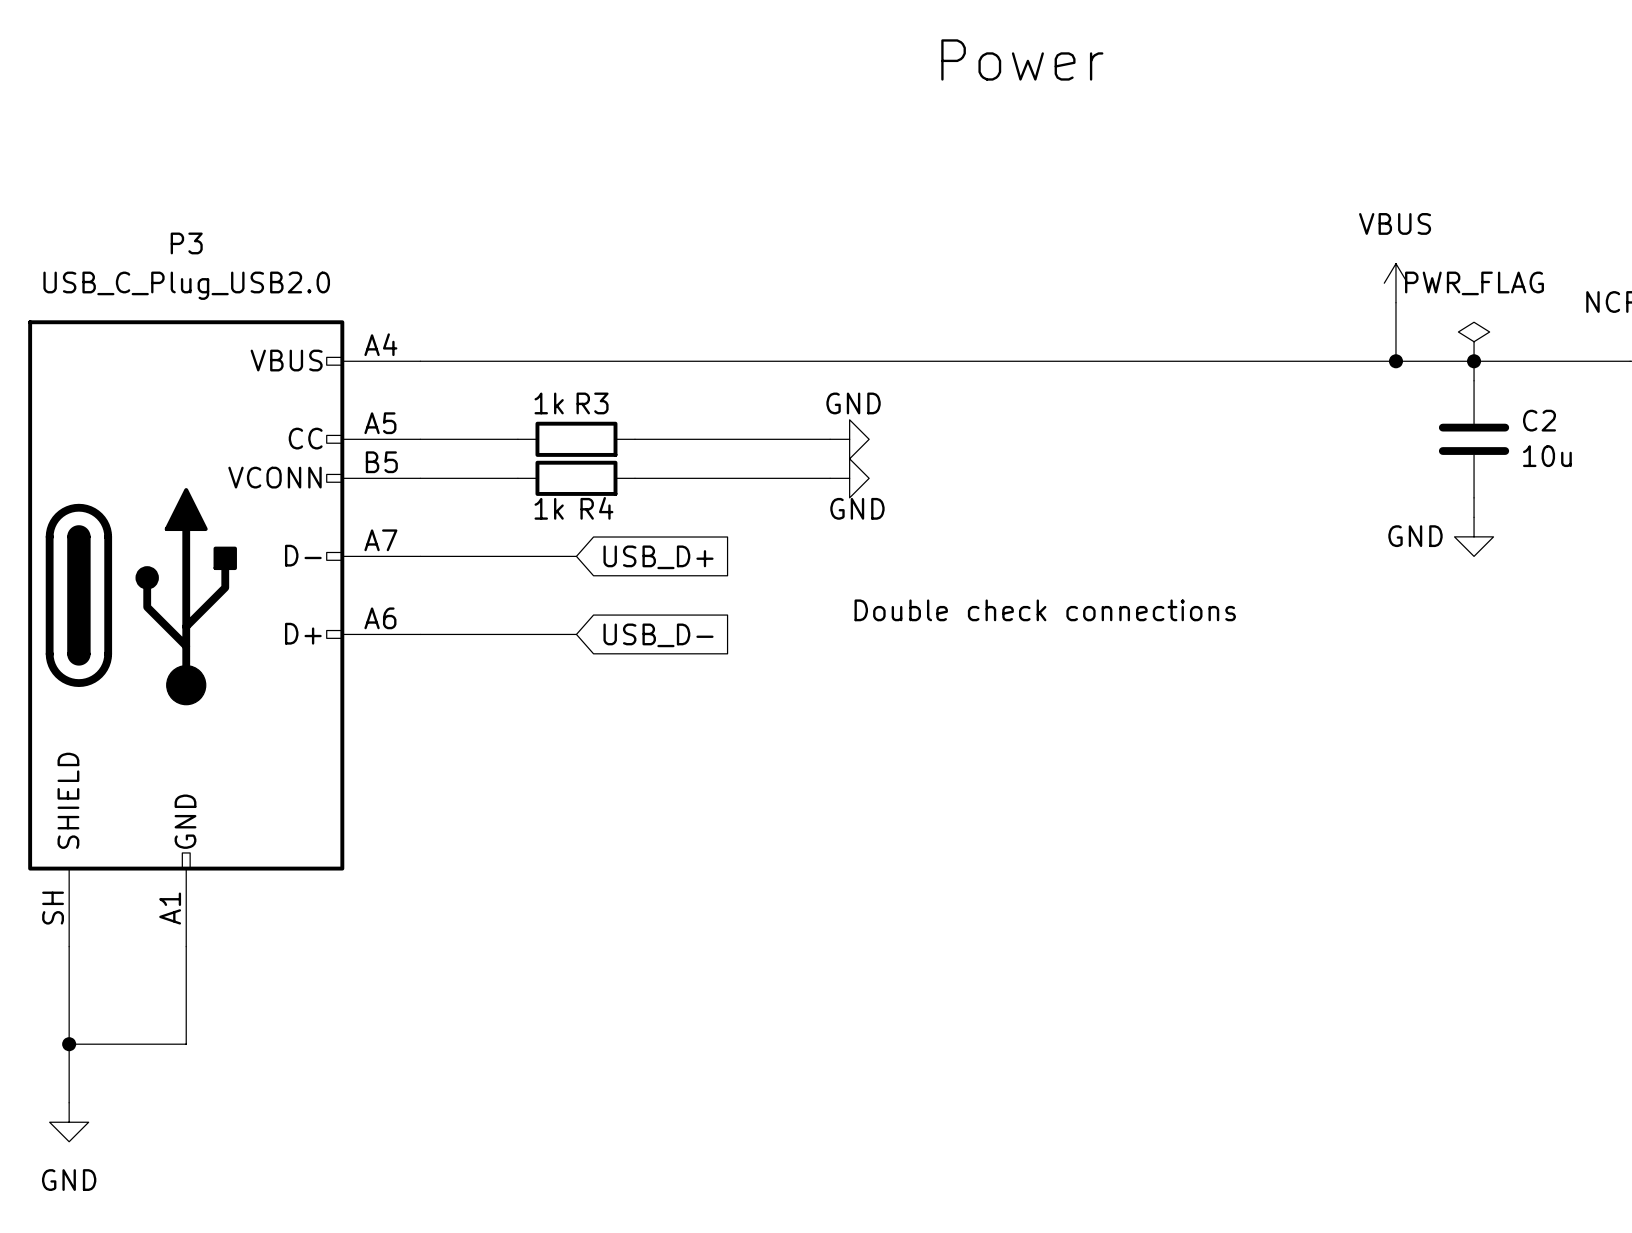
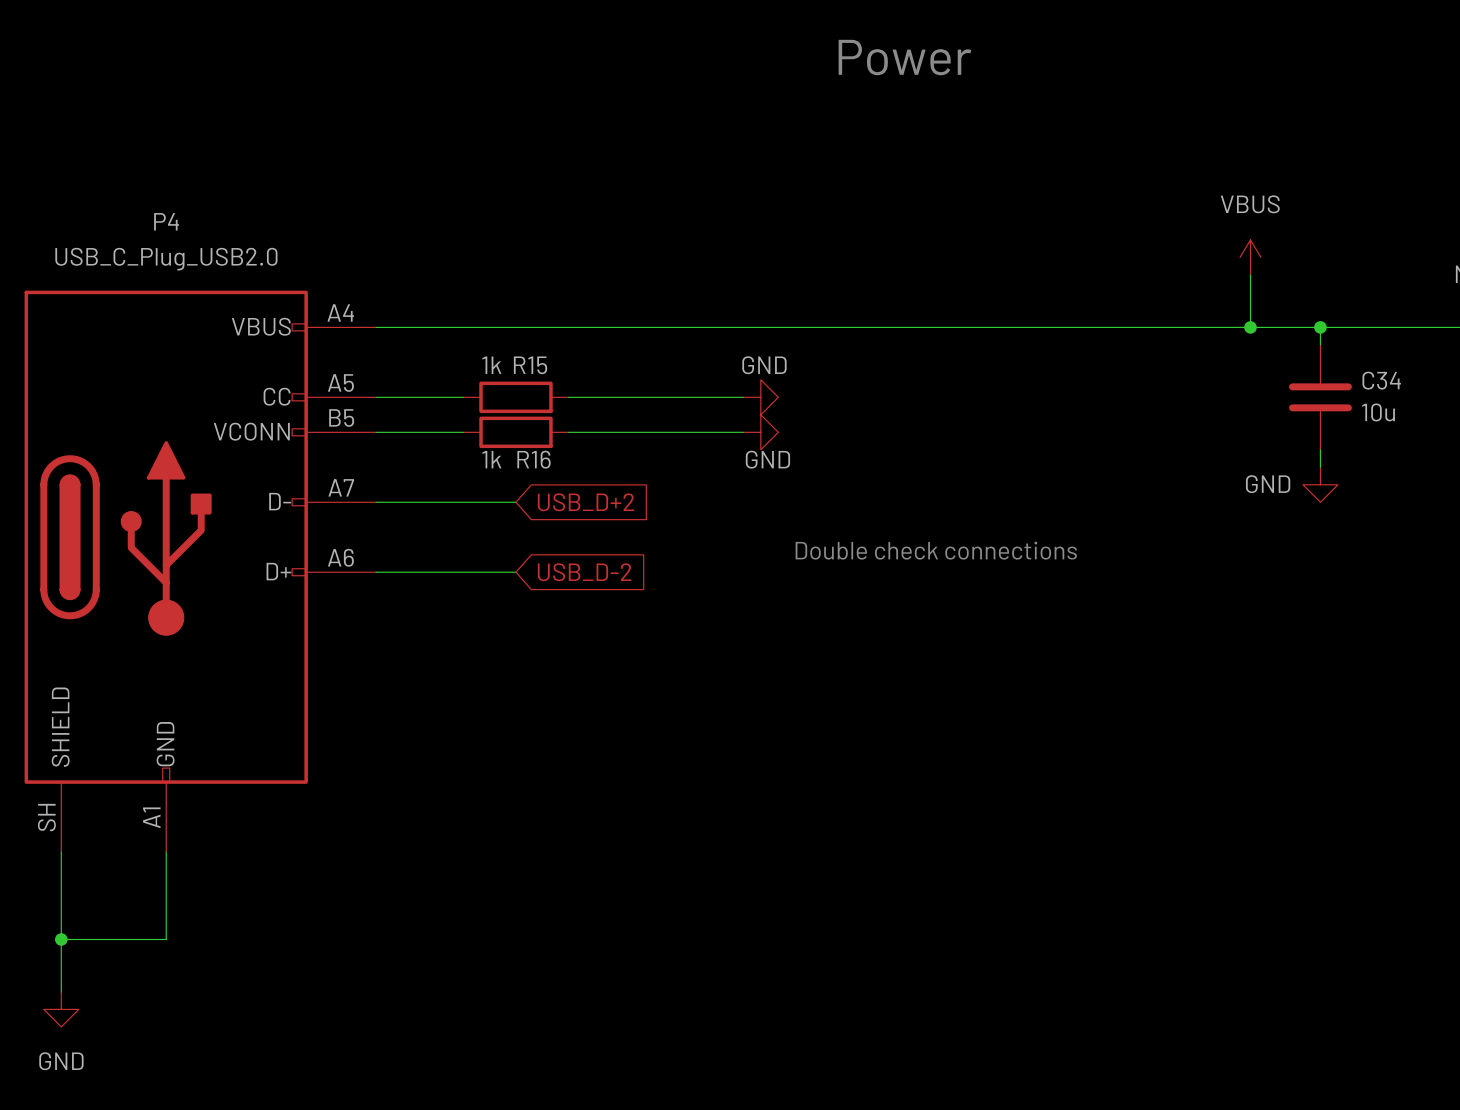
P3 name: P3 (186, 243) -> P4 (166, 221)
power symbol: PWR_FLAG (1474, 341) -> none
R3 name: R3 (592, 403) -> R15 (530, 365)
C2 name: C2 (1539, 420) -> C34 (1381, 380)
R4 name: R4 (596, 508) -> R16 (534, 459)
global label: USB_D+ (658, 557) -> USB_D+2 (585, 502)
global label: USB_D- (658, 635) -> USB_D-2 (584, 572)

